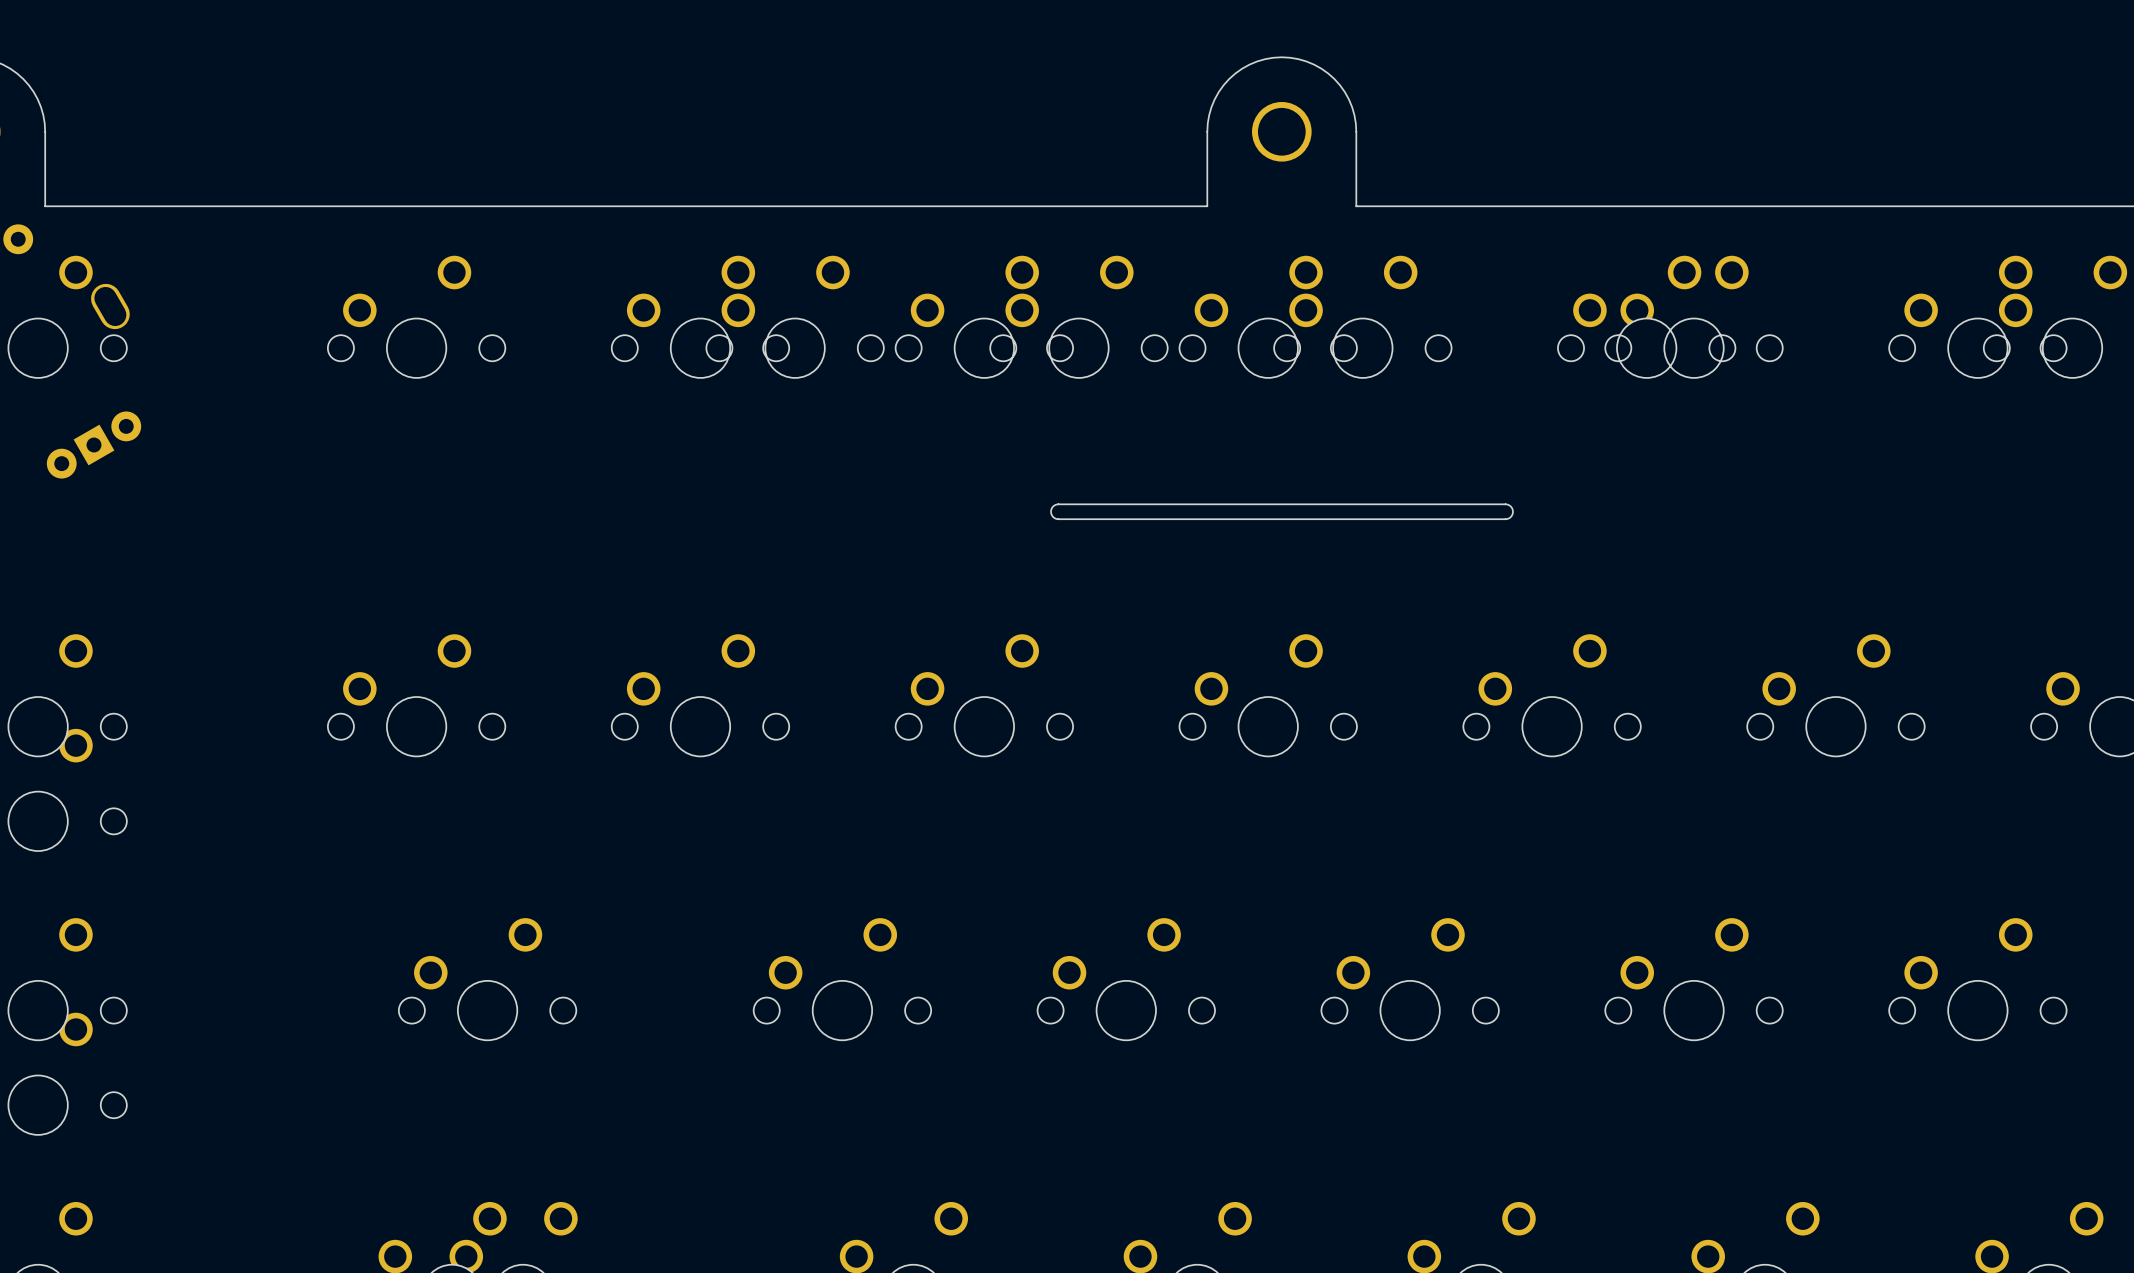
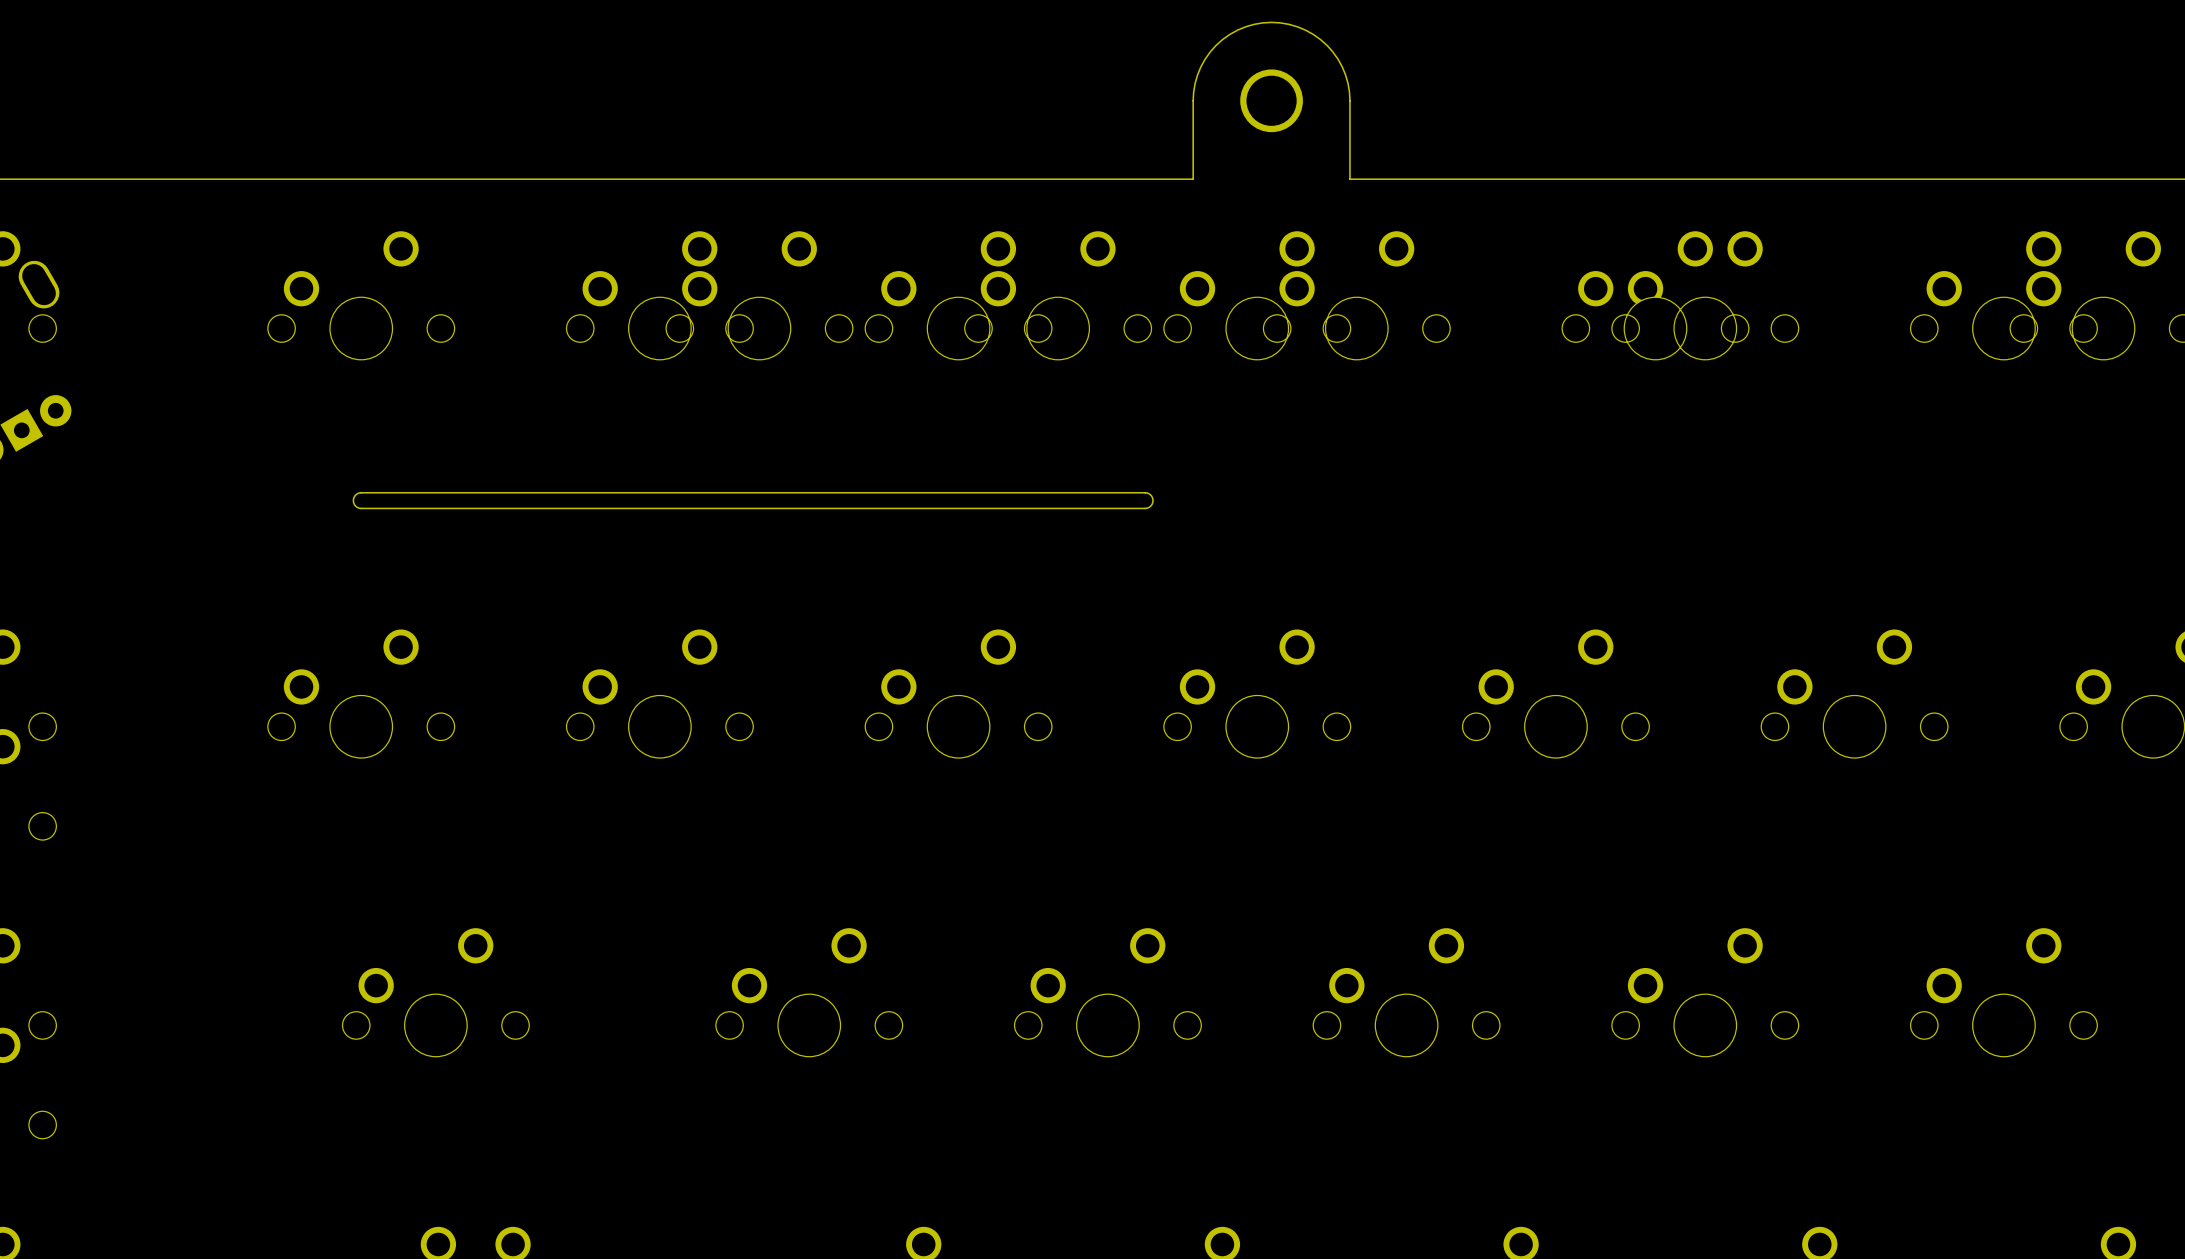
board edge: (1058, 504) (1053, 506) (1051, 511) (1053, 517) (1058, 519) -> (1036, 492) (361, 492) (355, 495) (353, 500) (355, 506) (361, 508) (1036, 508)
board edge: (1161, 504) (1505, 504) (1510, 506) (1512, 511) (1510, 517) (1505, 519) (1161, 519) -> (1145, 492) (1150, 495) (1153, 500) (1150, 506) (1145, 508)

